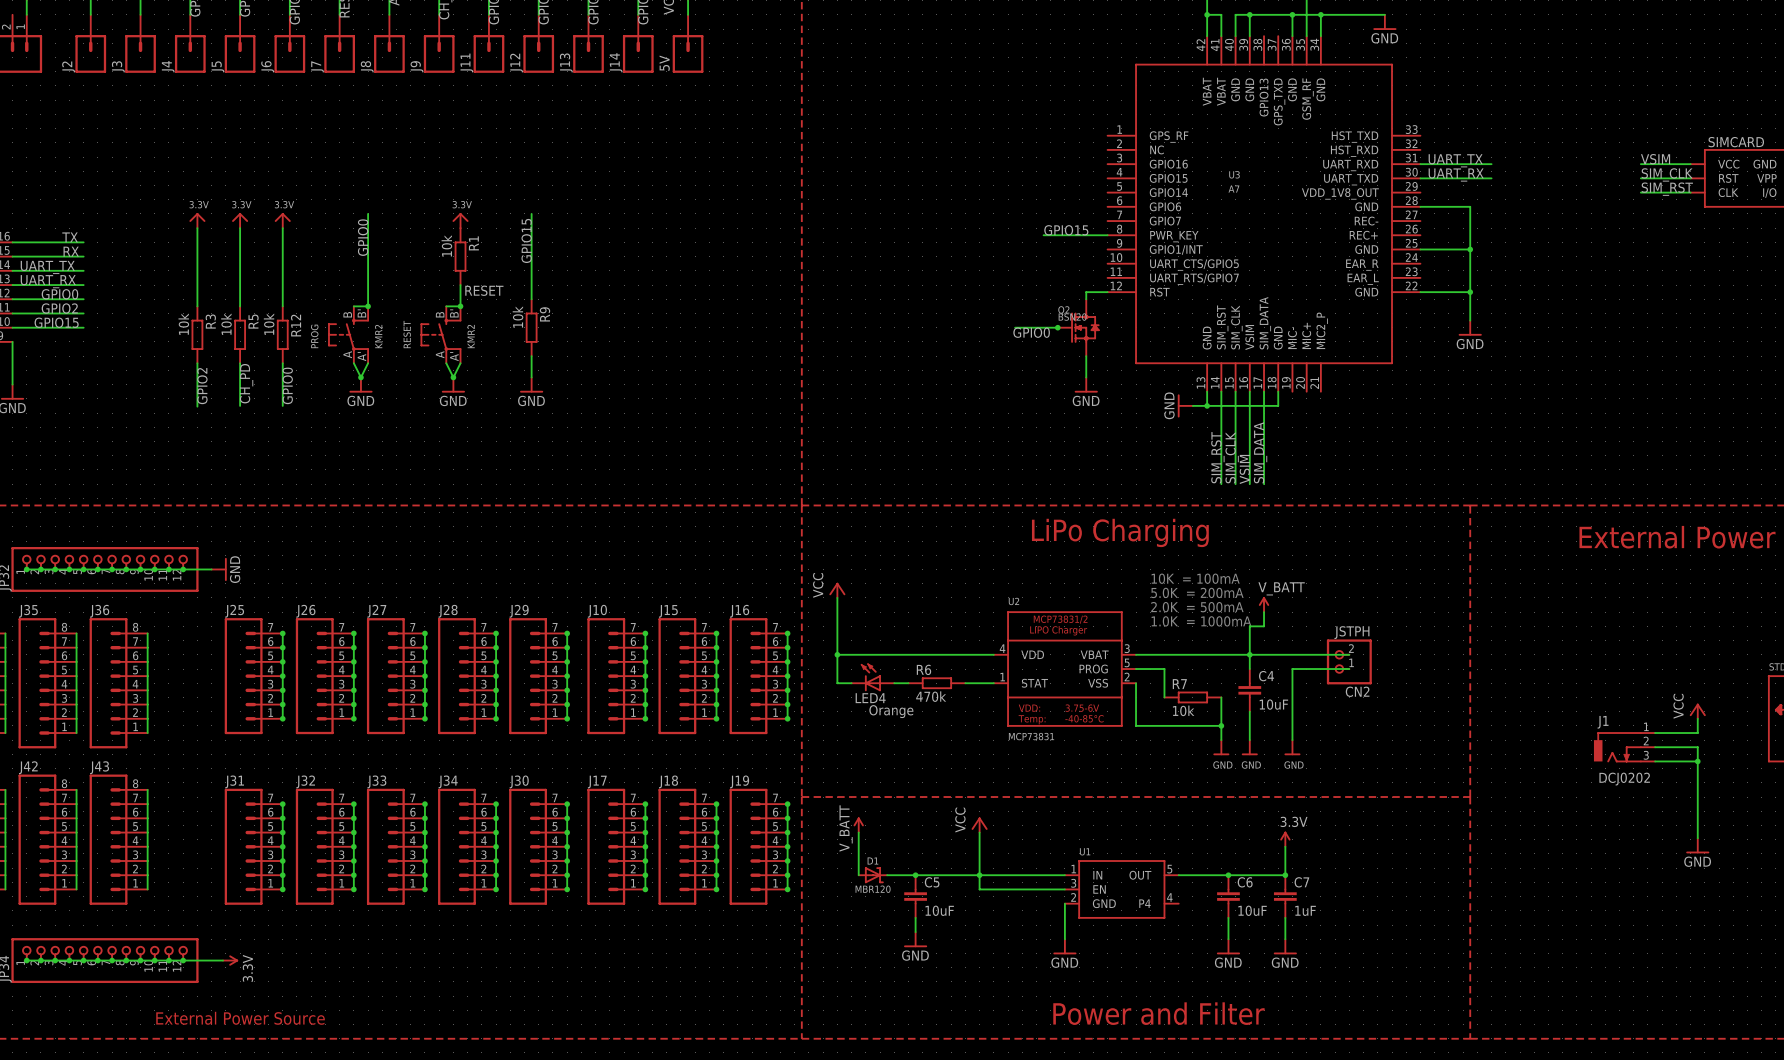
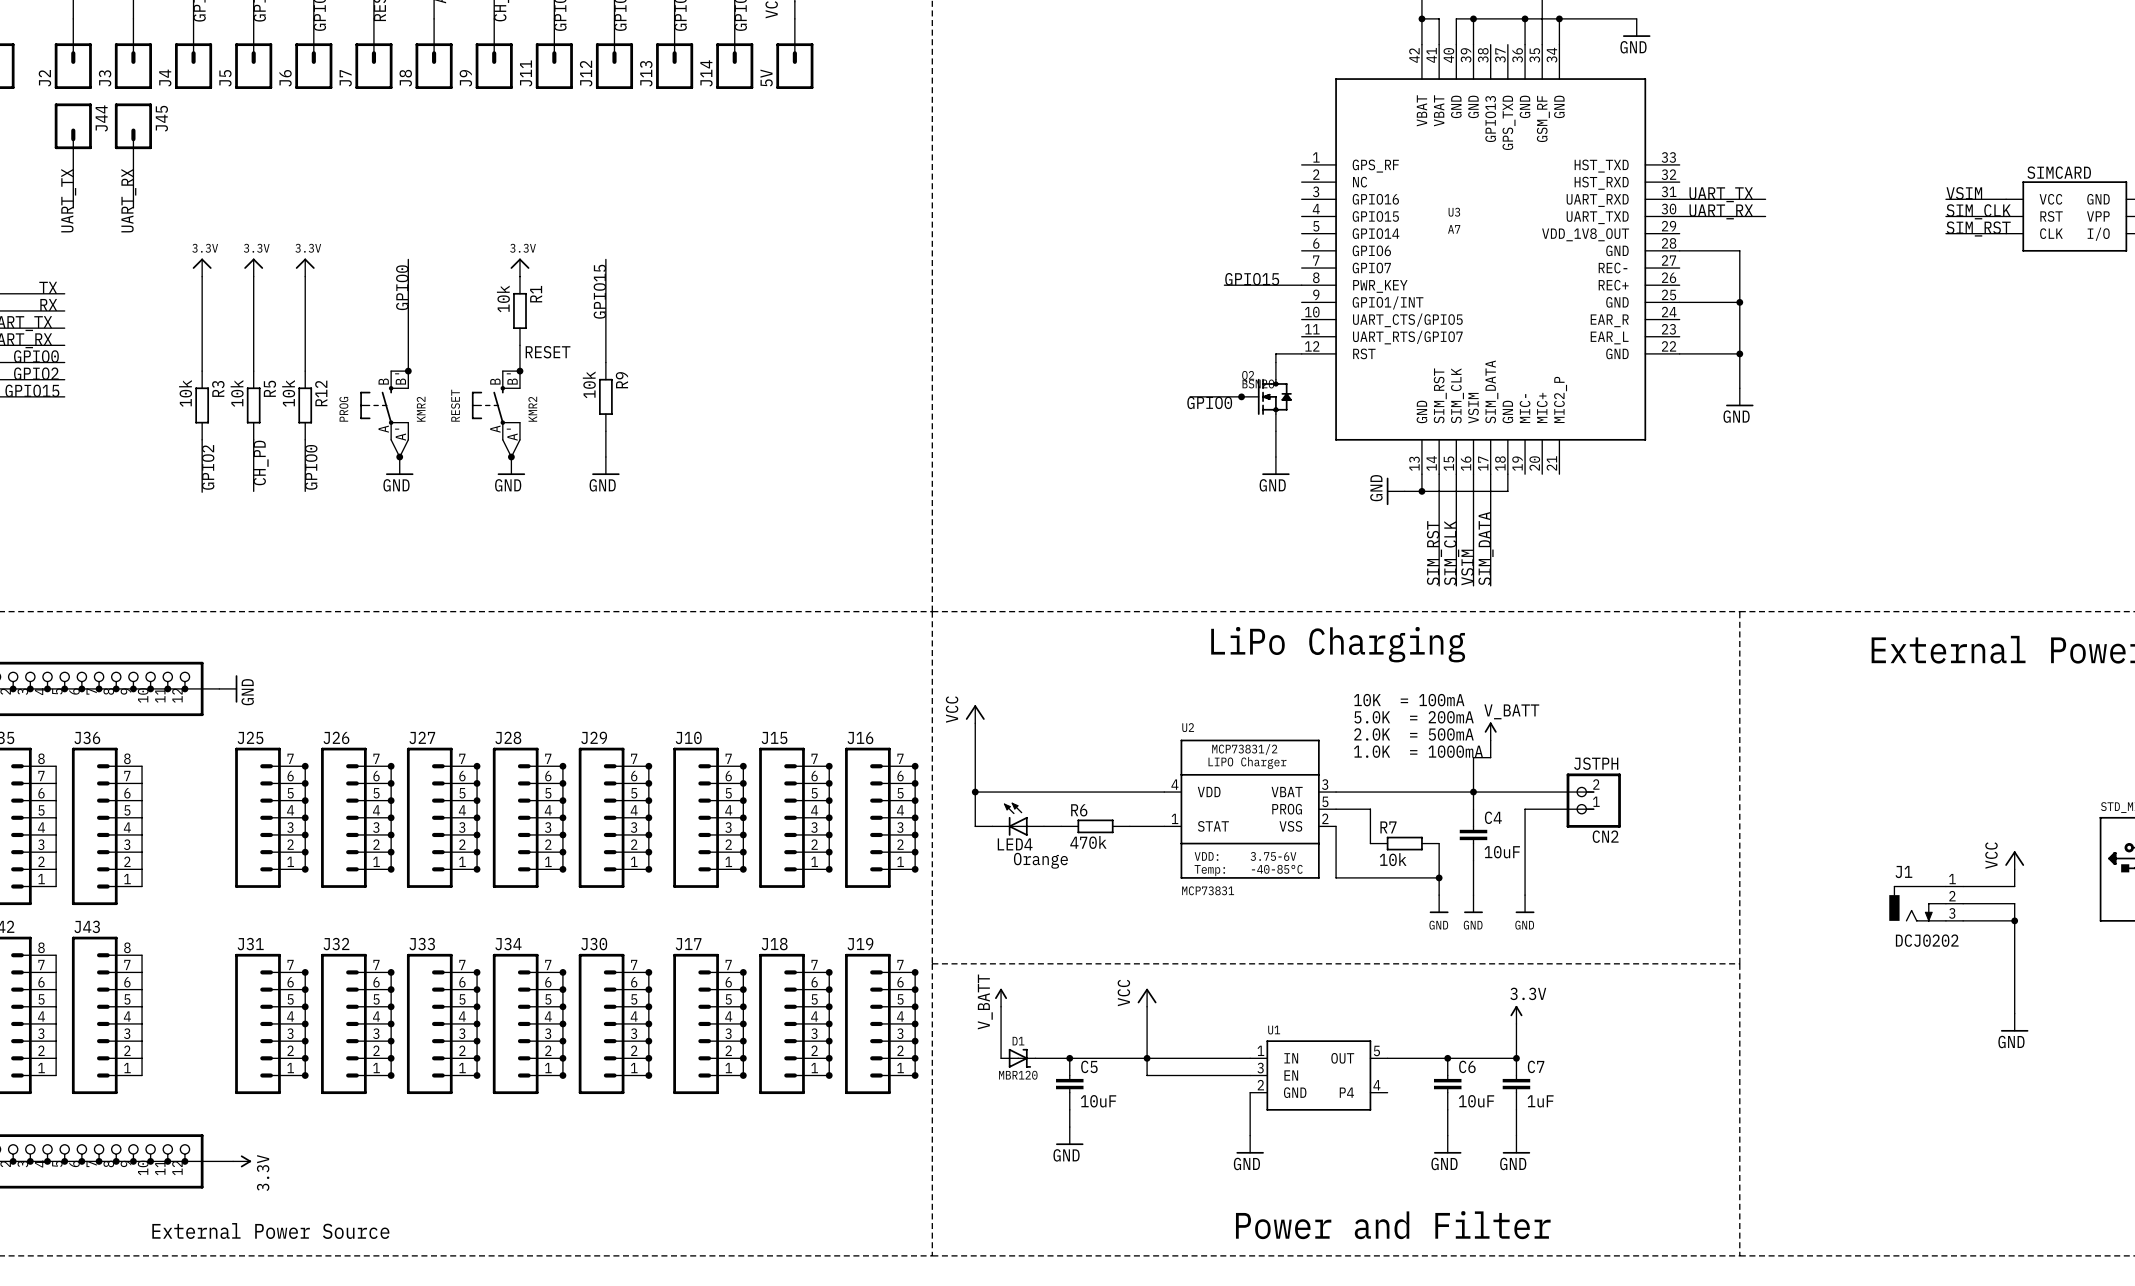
J44: none -> (73, 138)
J45: none -> (133, 138)
wire: none -> (73, 173) (73, 207)
wire: none -> (133, 173) (133, 207)
label: none -> UART_RX (128, 200)
label: none -> UART_TX (68, 200)

